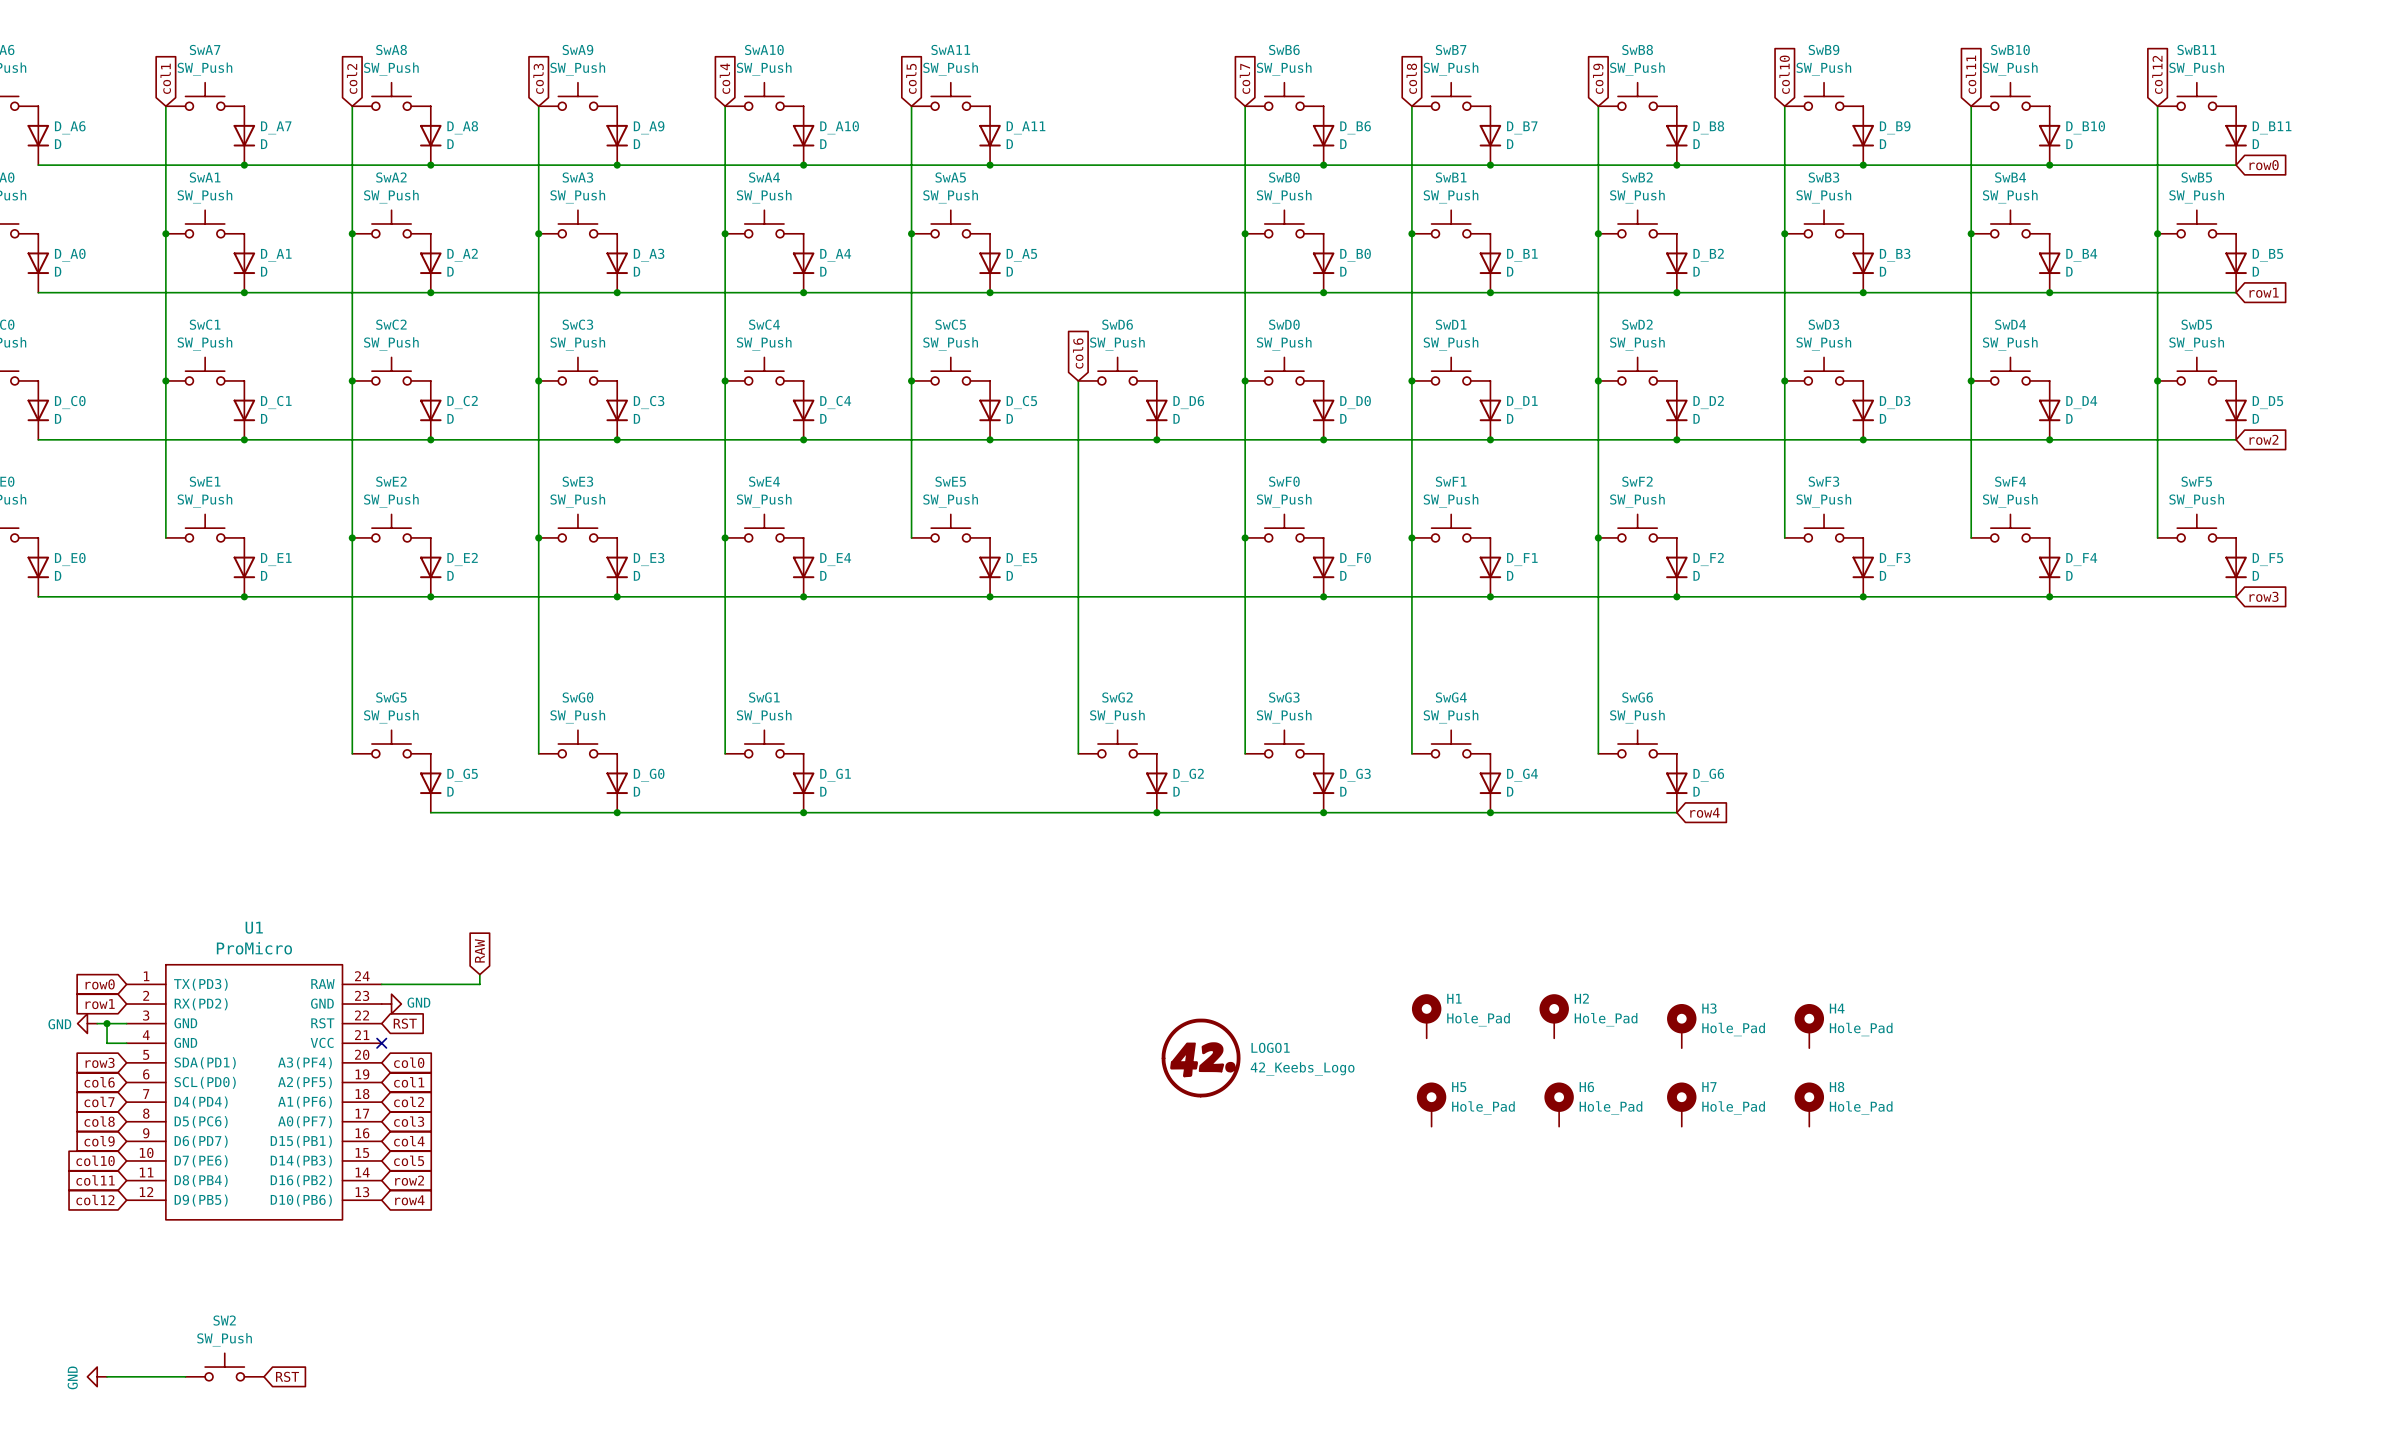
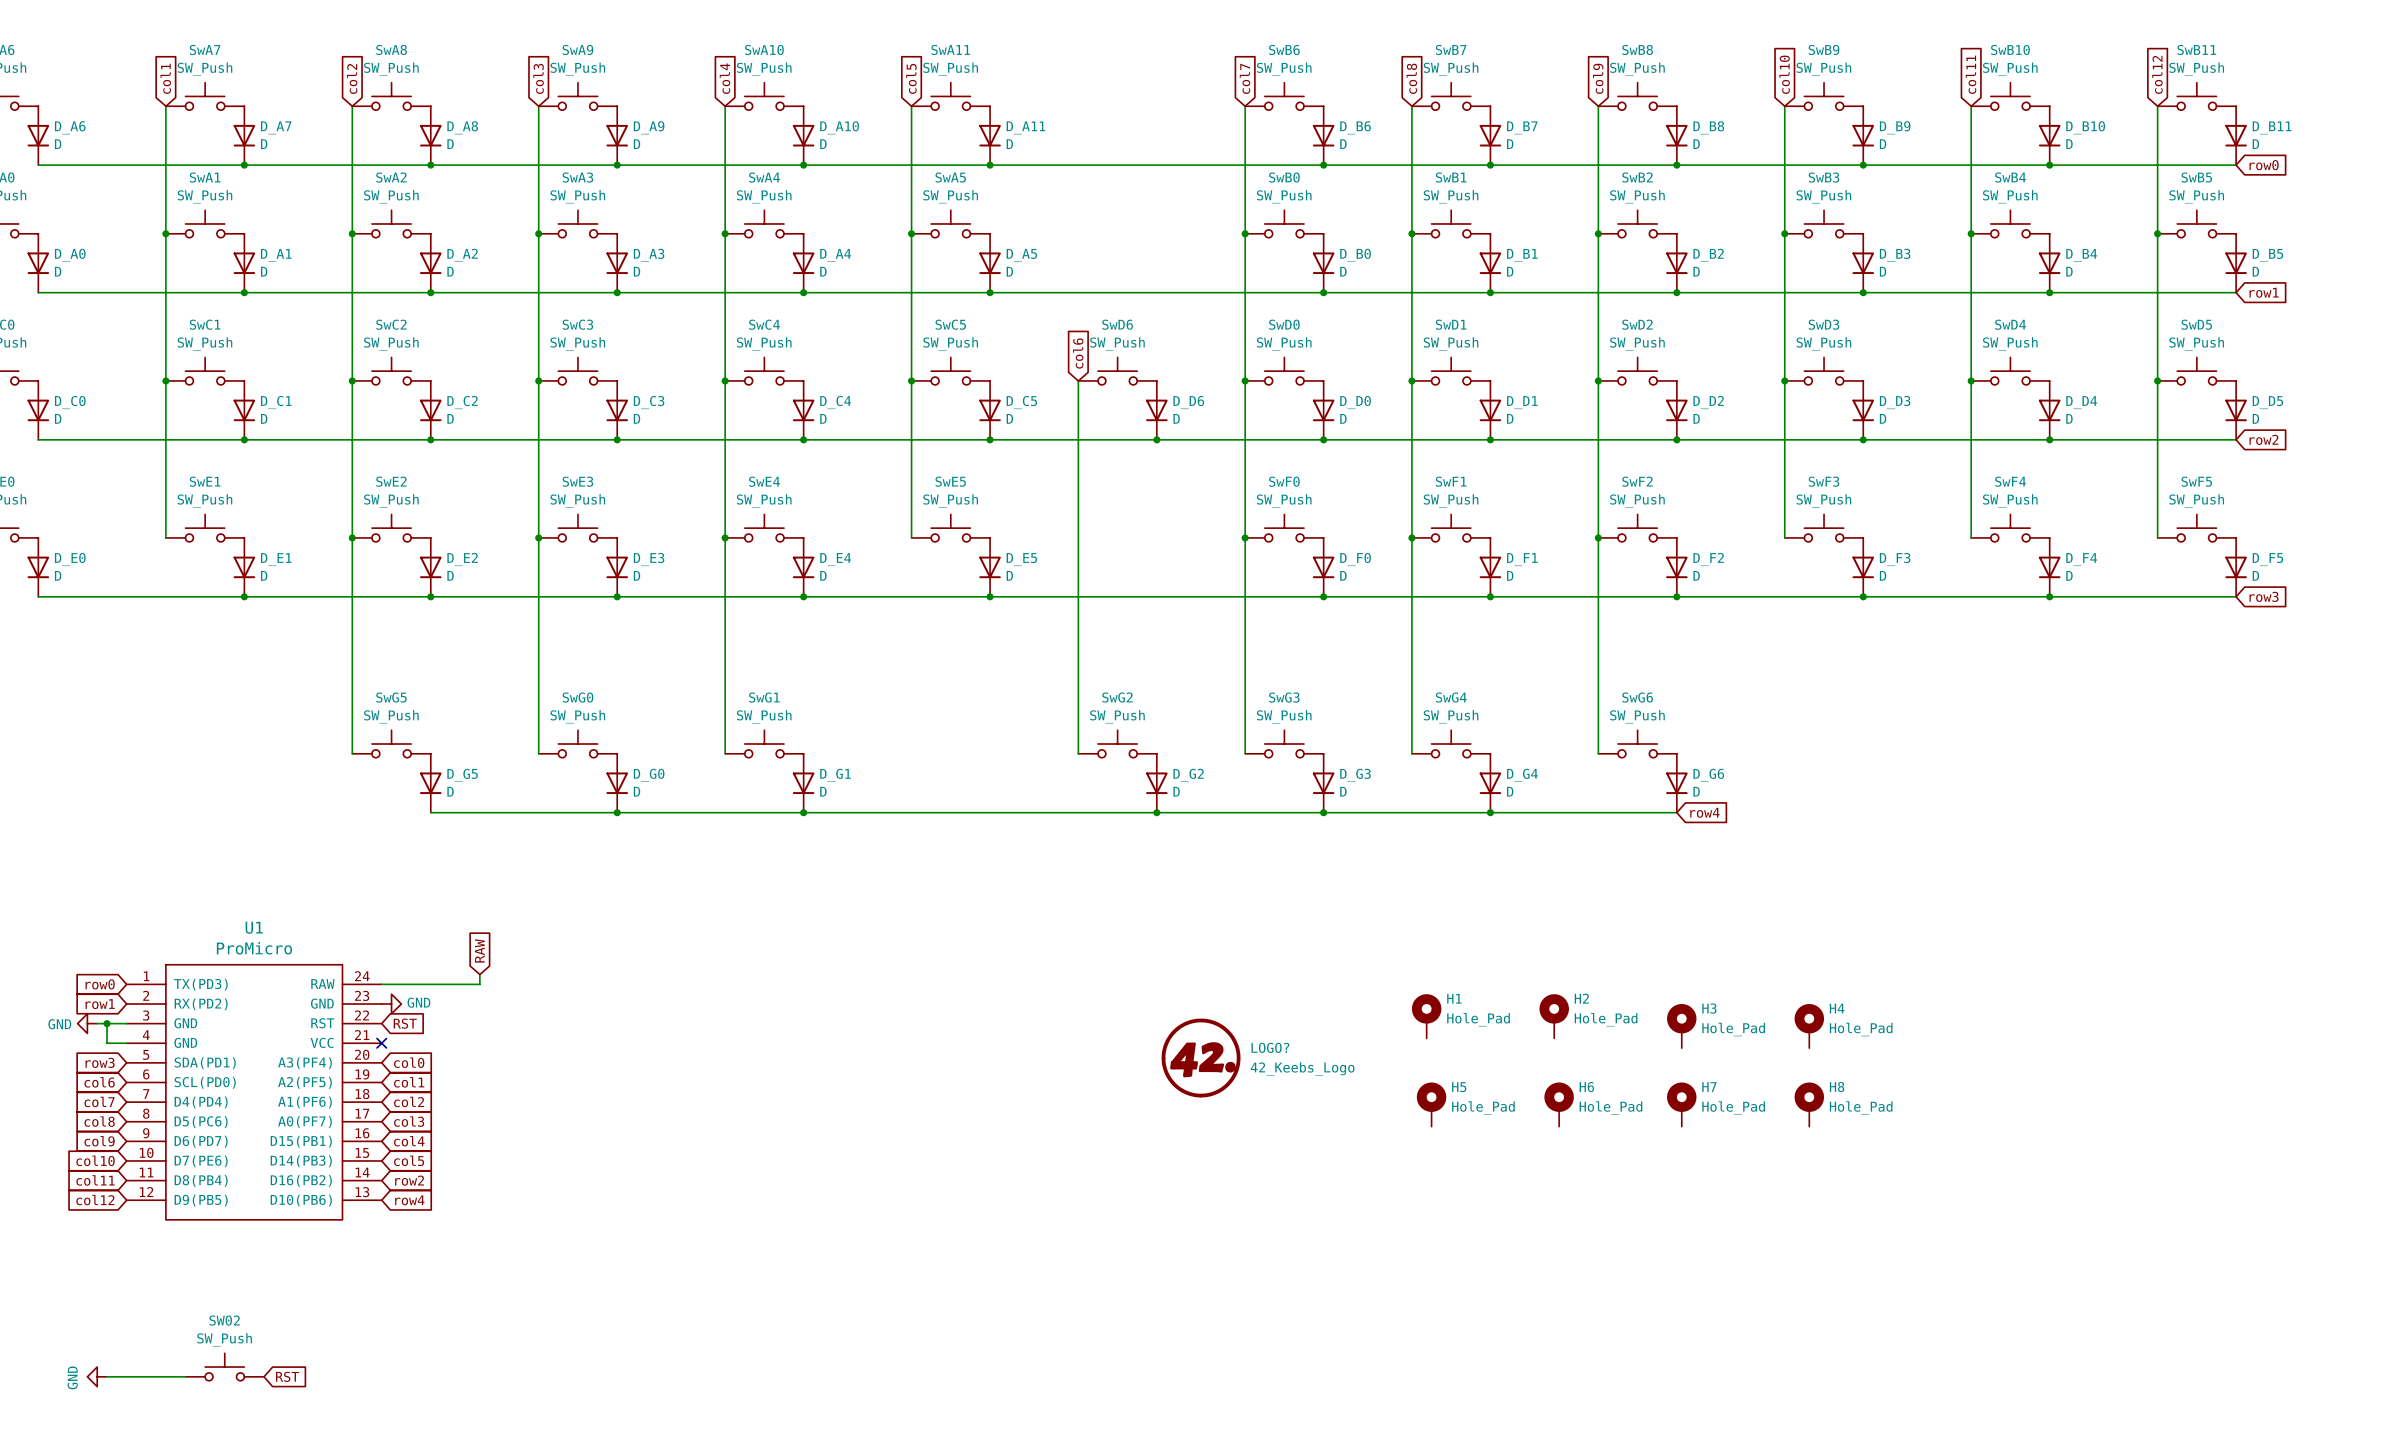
LOGO1 name: LOGO1 (1270, 1047) -> LOGO? (1270, 1047)
SW2 name: SW2 (224, 1320) -> SW02 (224, 1320)

